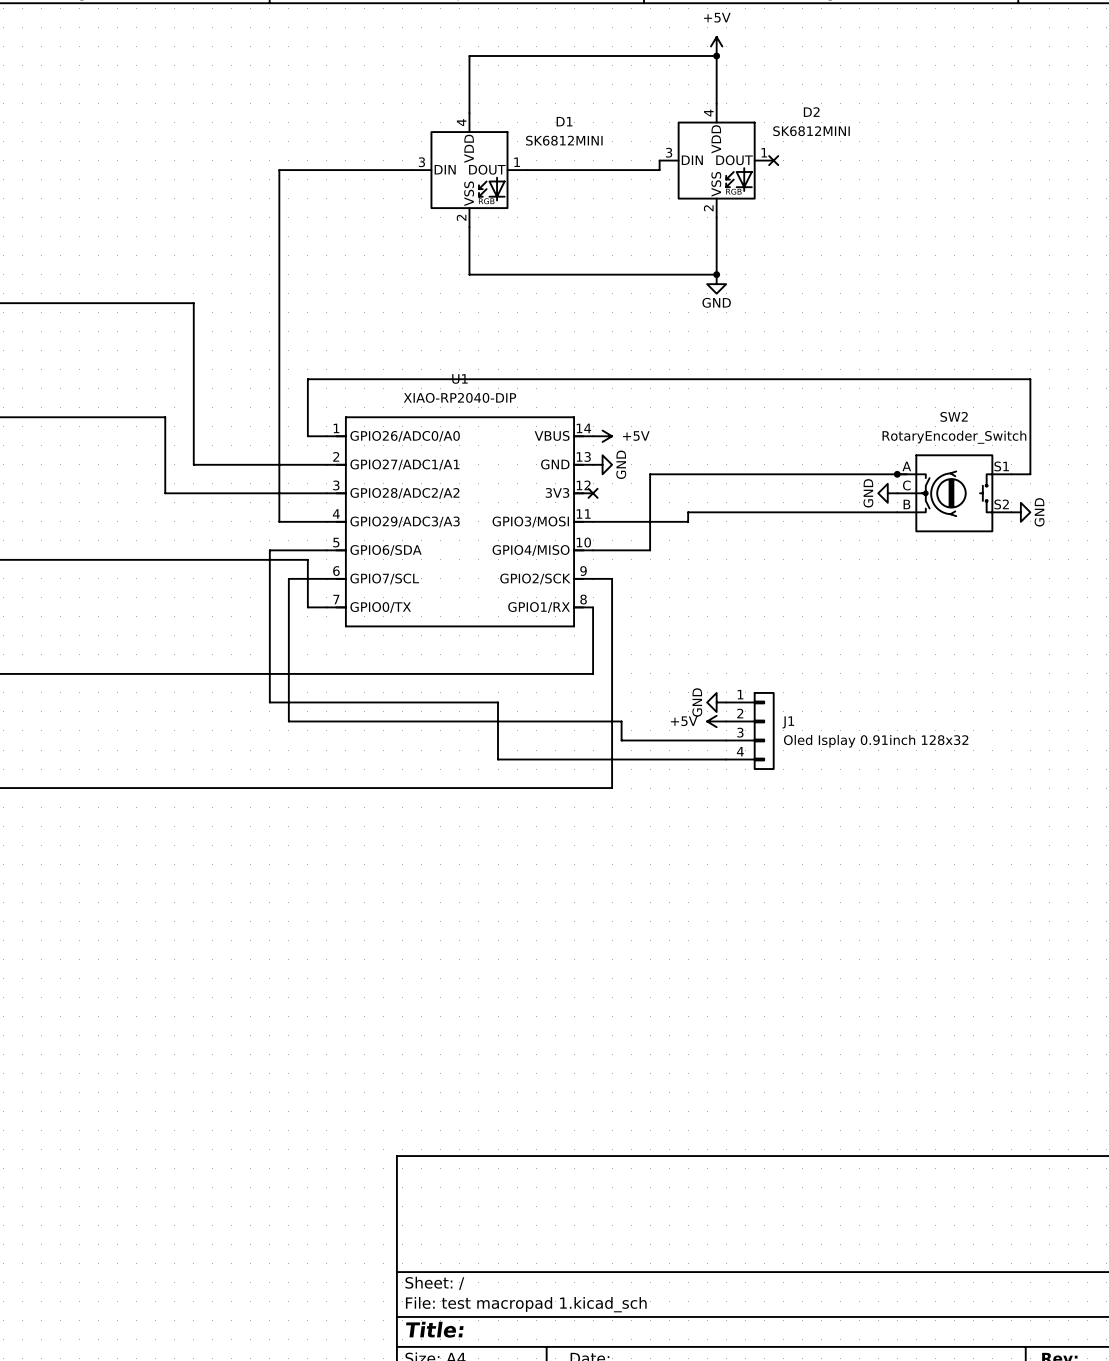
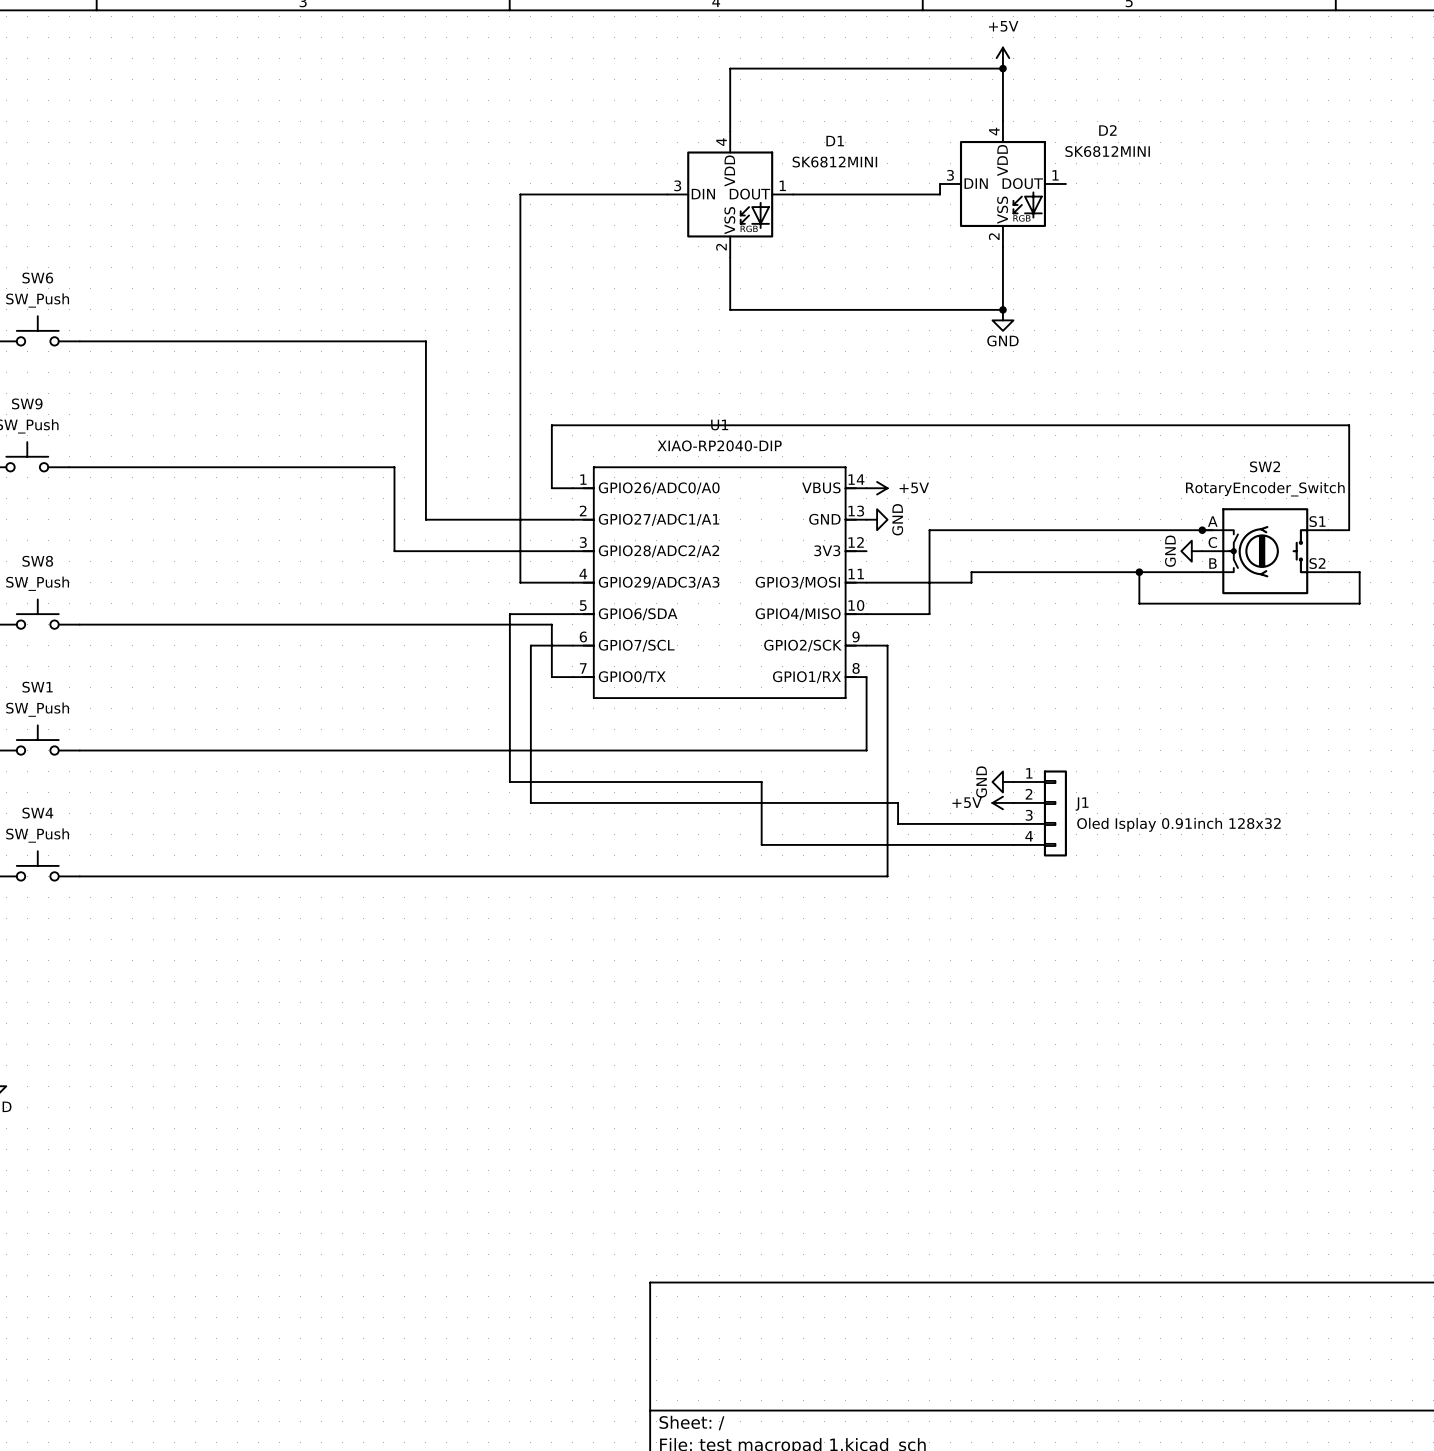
no-connect mark: (773, 160) -> none
no-connect mark: (593, 493) -> none
wire: none -> (1139, 572) (1139, 603) (1359, 603) (1359, 572) (1328, 572)
junction: none -> (1139, 572)
power symbol: GND (1020, 512) -> none

